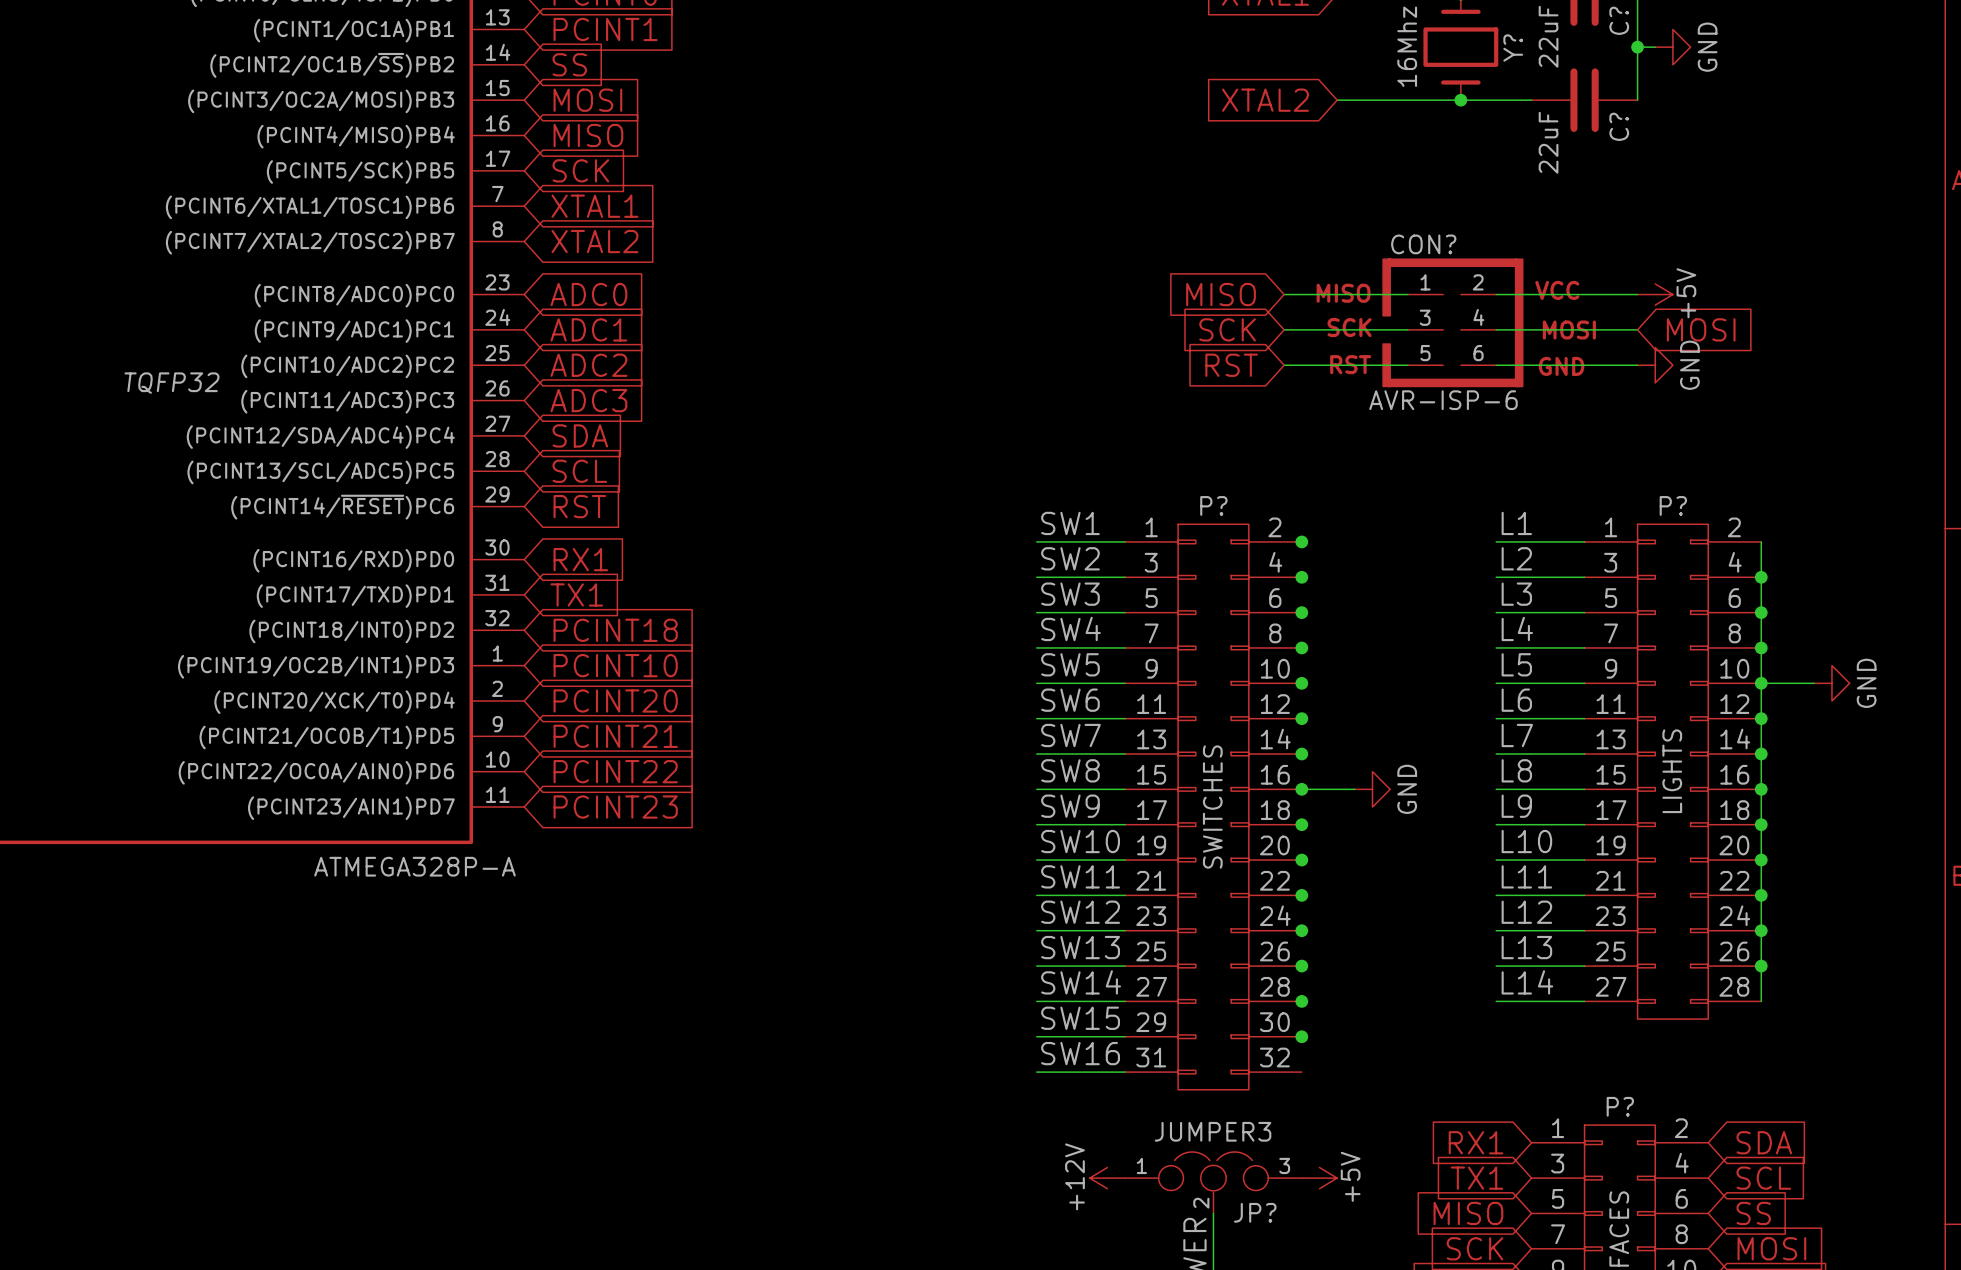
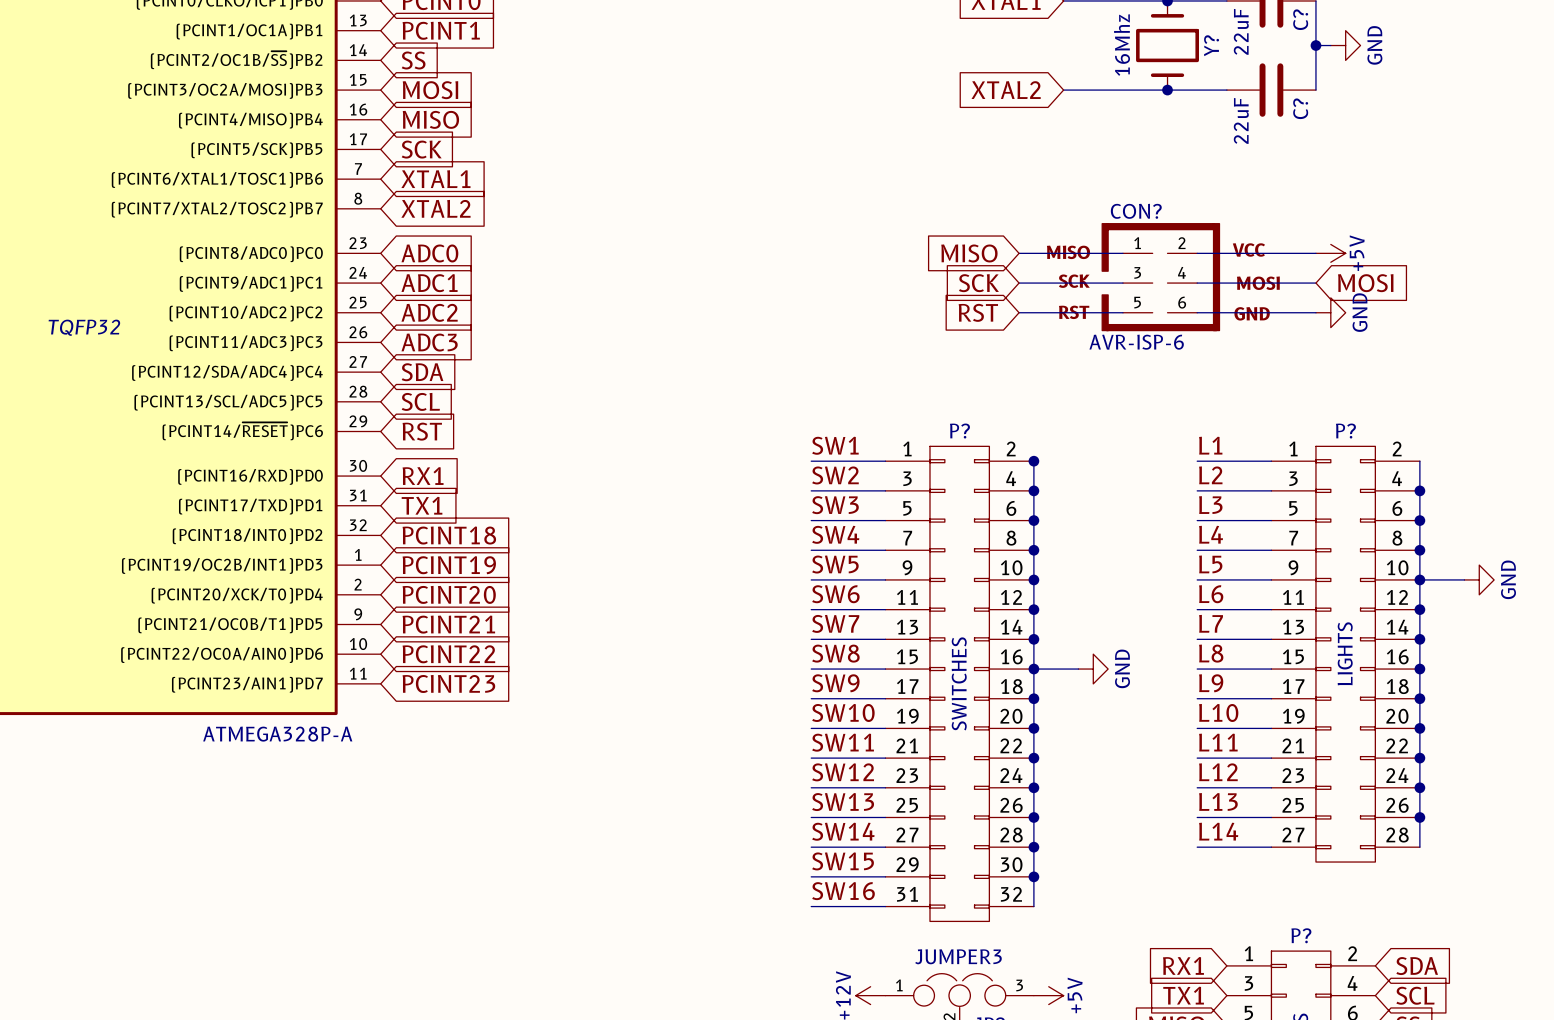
wire: none -> (1033, 461) (1033, 906)
global label: PCINT10 (615, 665) -> PCINT19 (449, 565)

